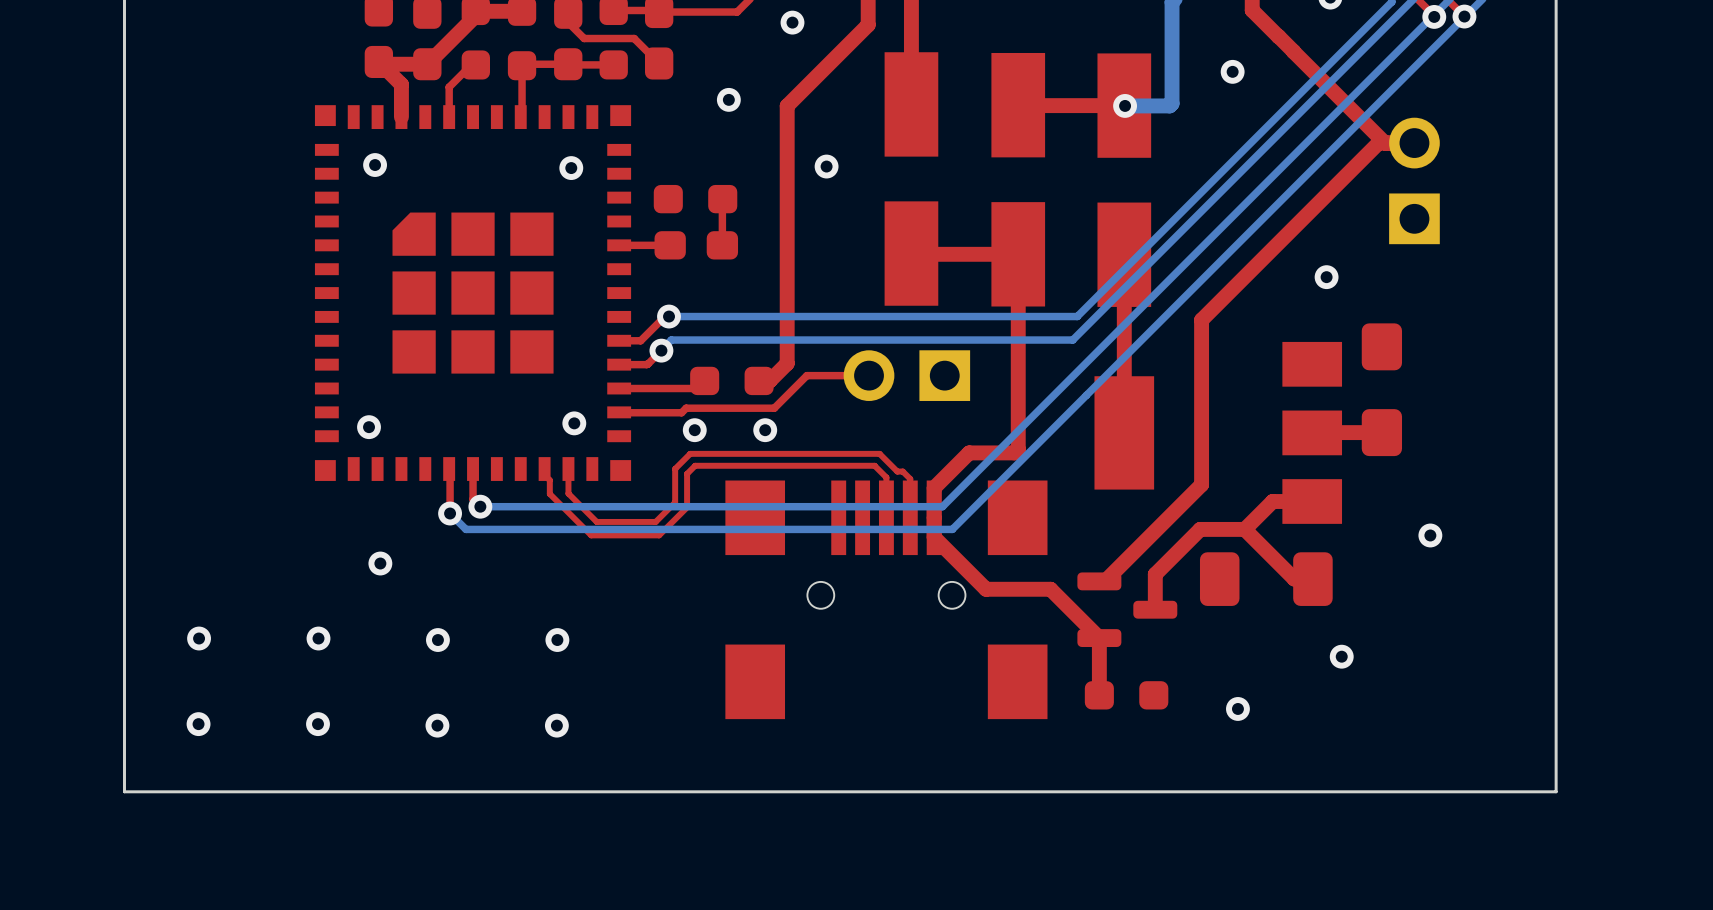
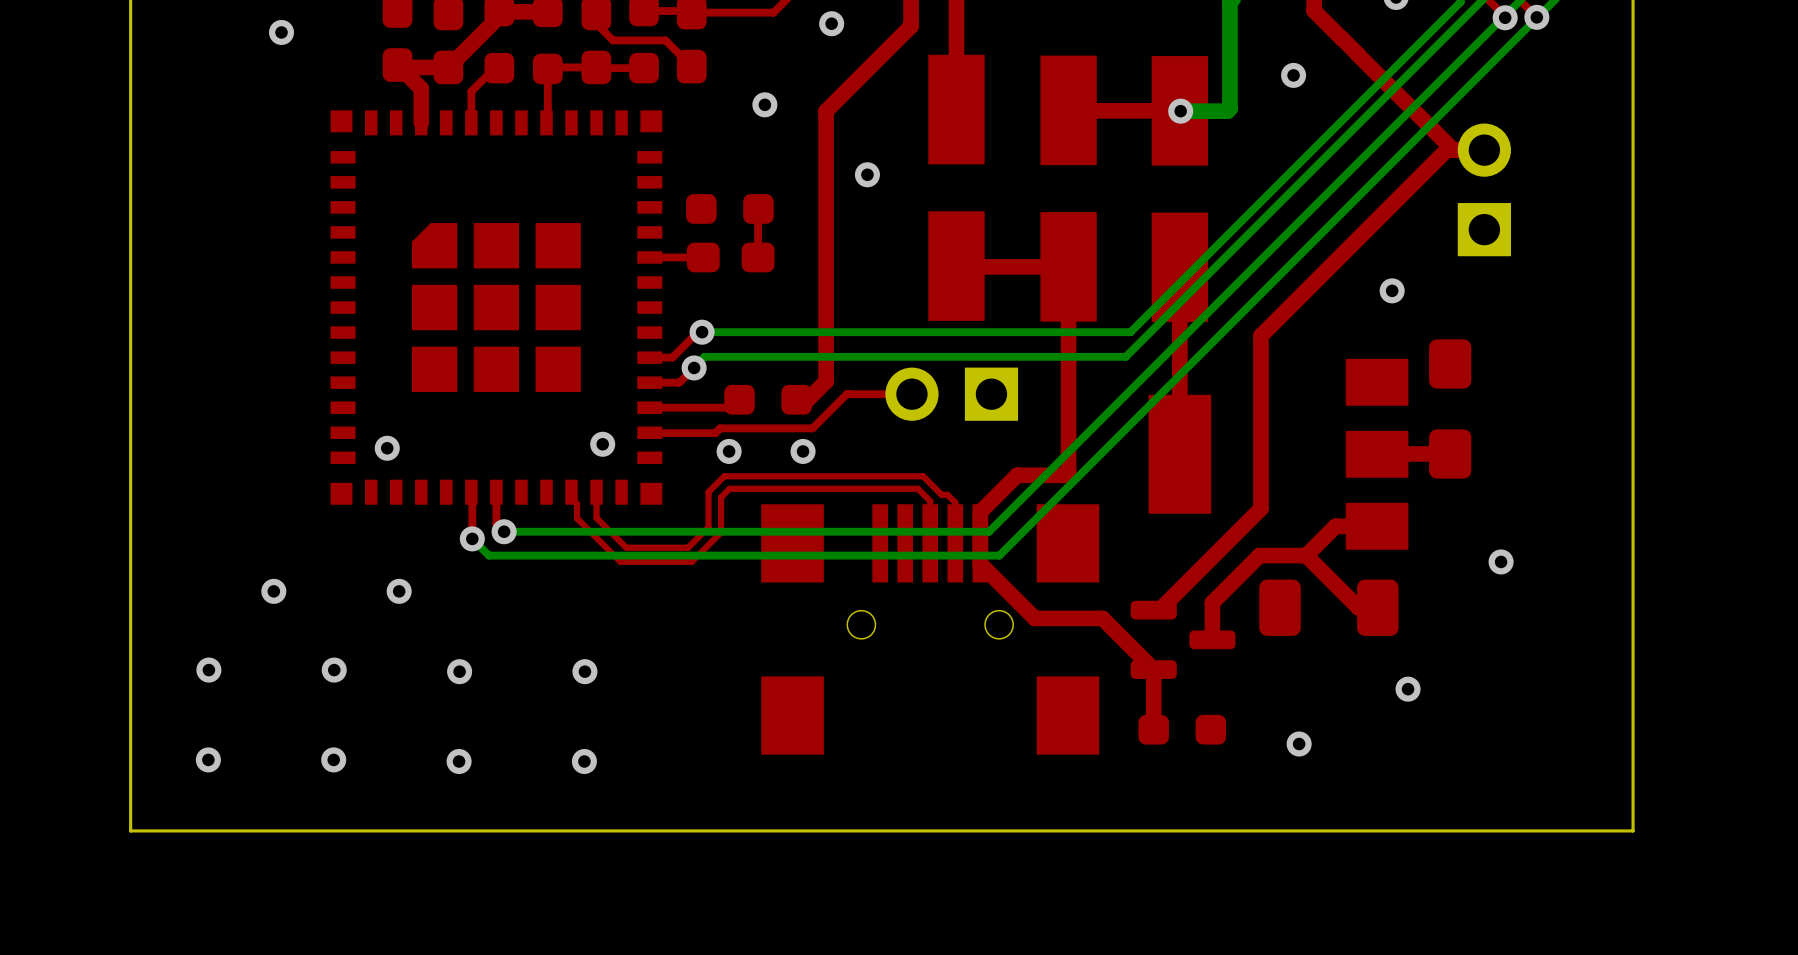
via: none -> (281, 32)
via: (375, 165) -> none
via: (571, 168) -> none
via: none -> (273, 591)

